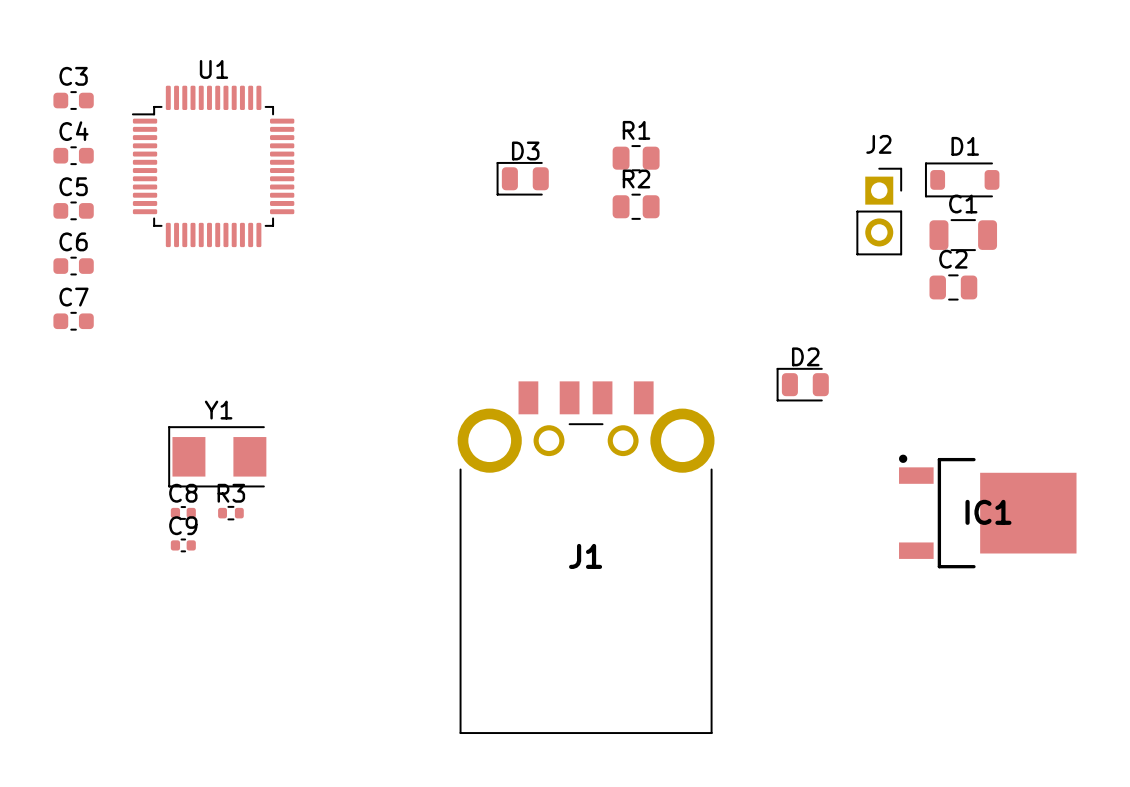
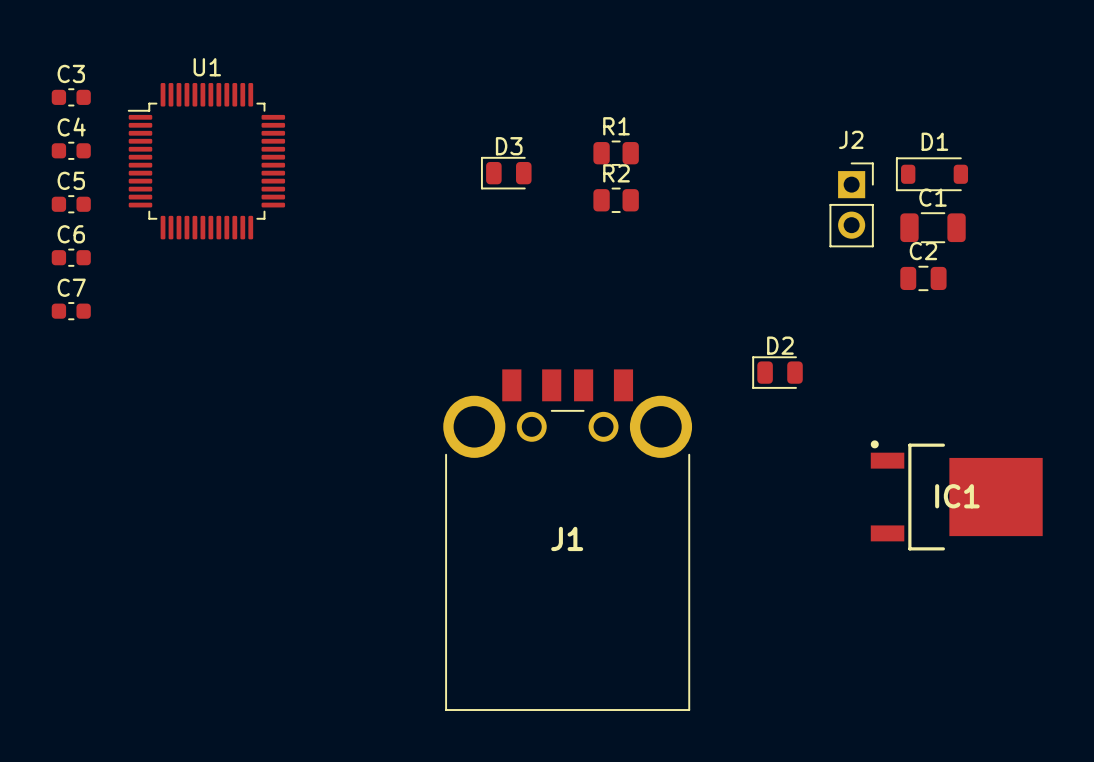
Y1: (217, 456) -> none
C8: (183, 512) -> none
R3: (230, 513) -> none
C9: (183, 545) -> none

